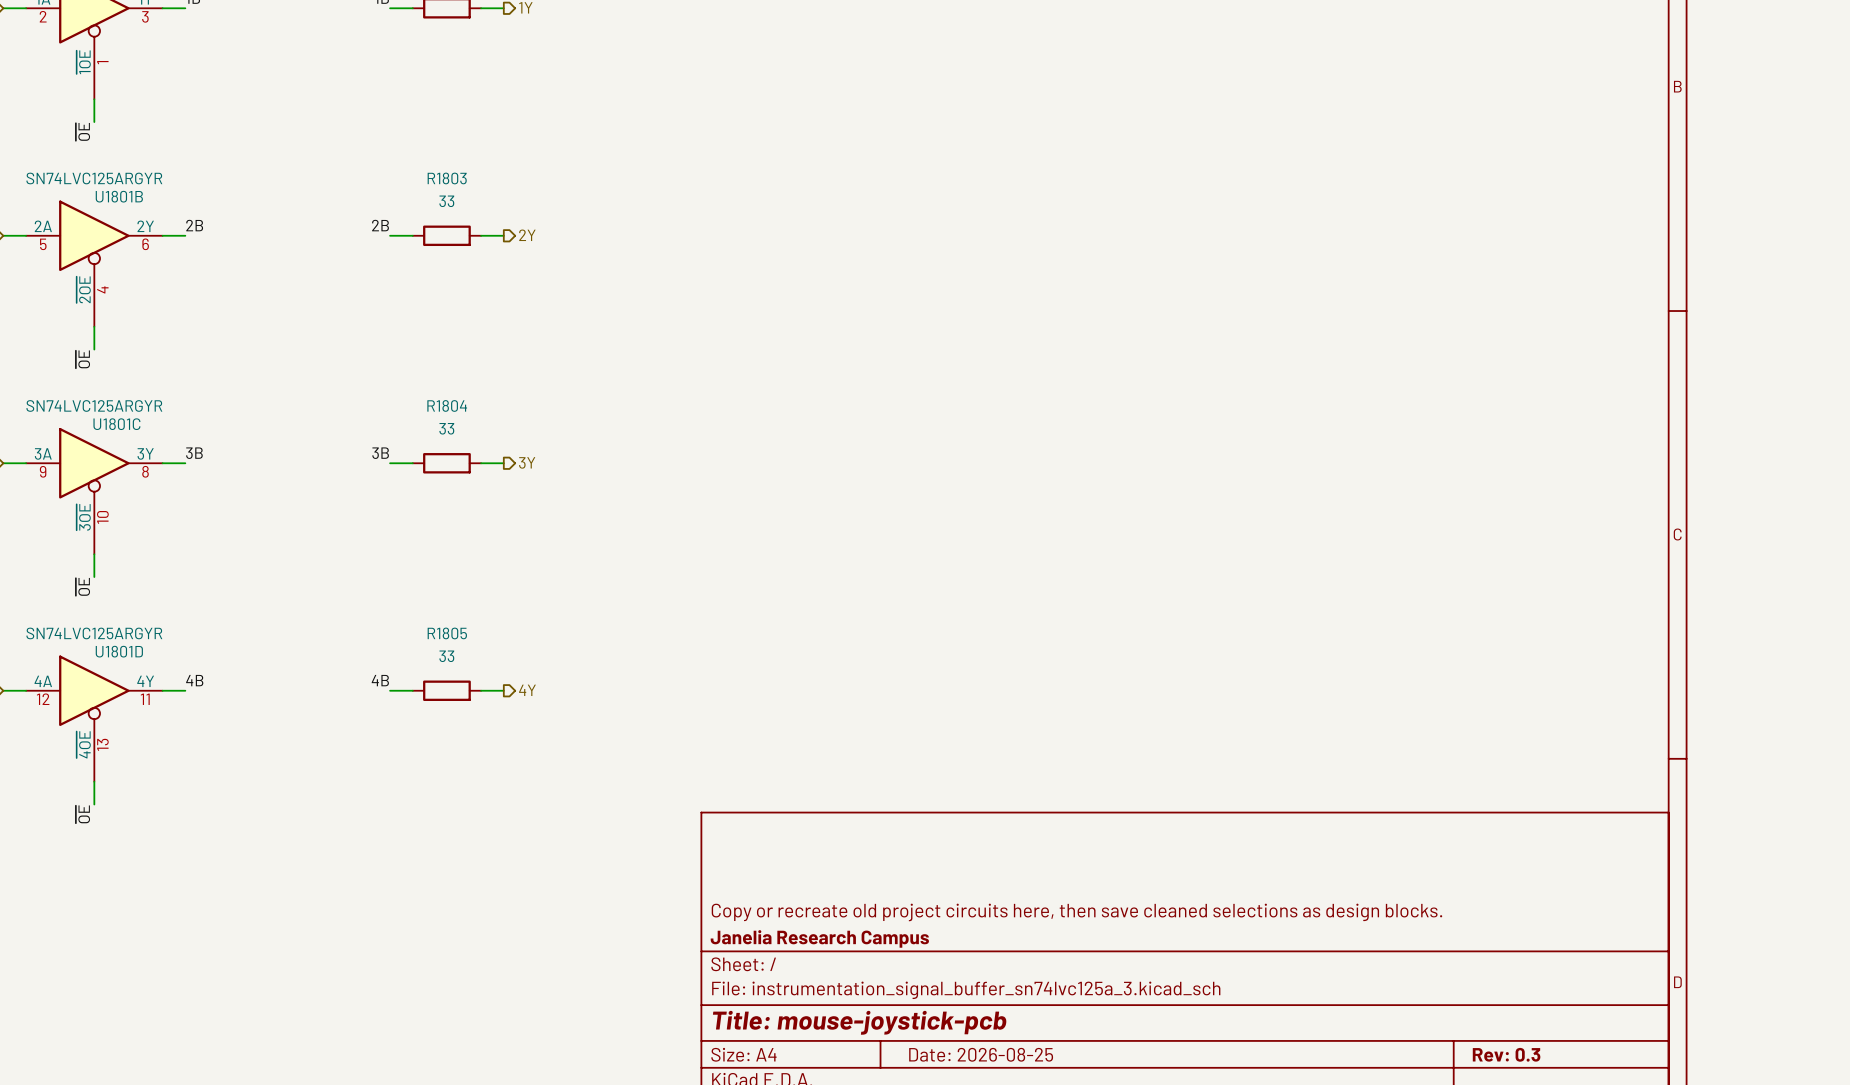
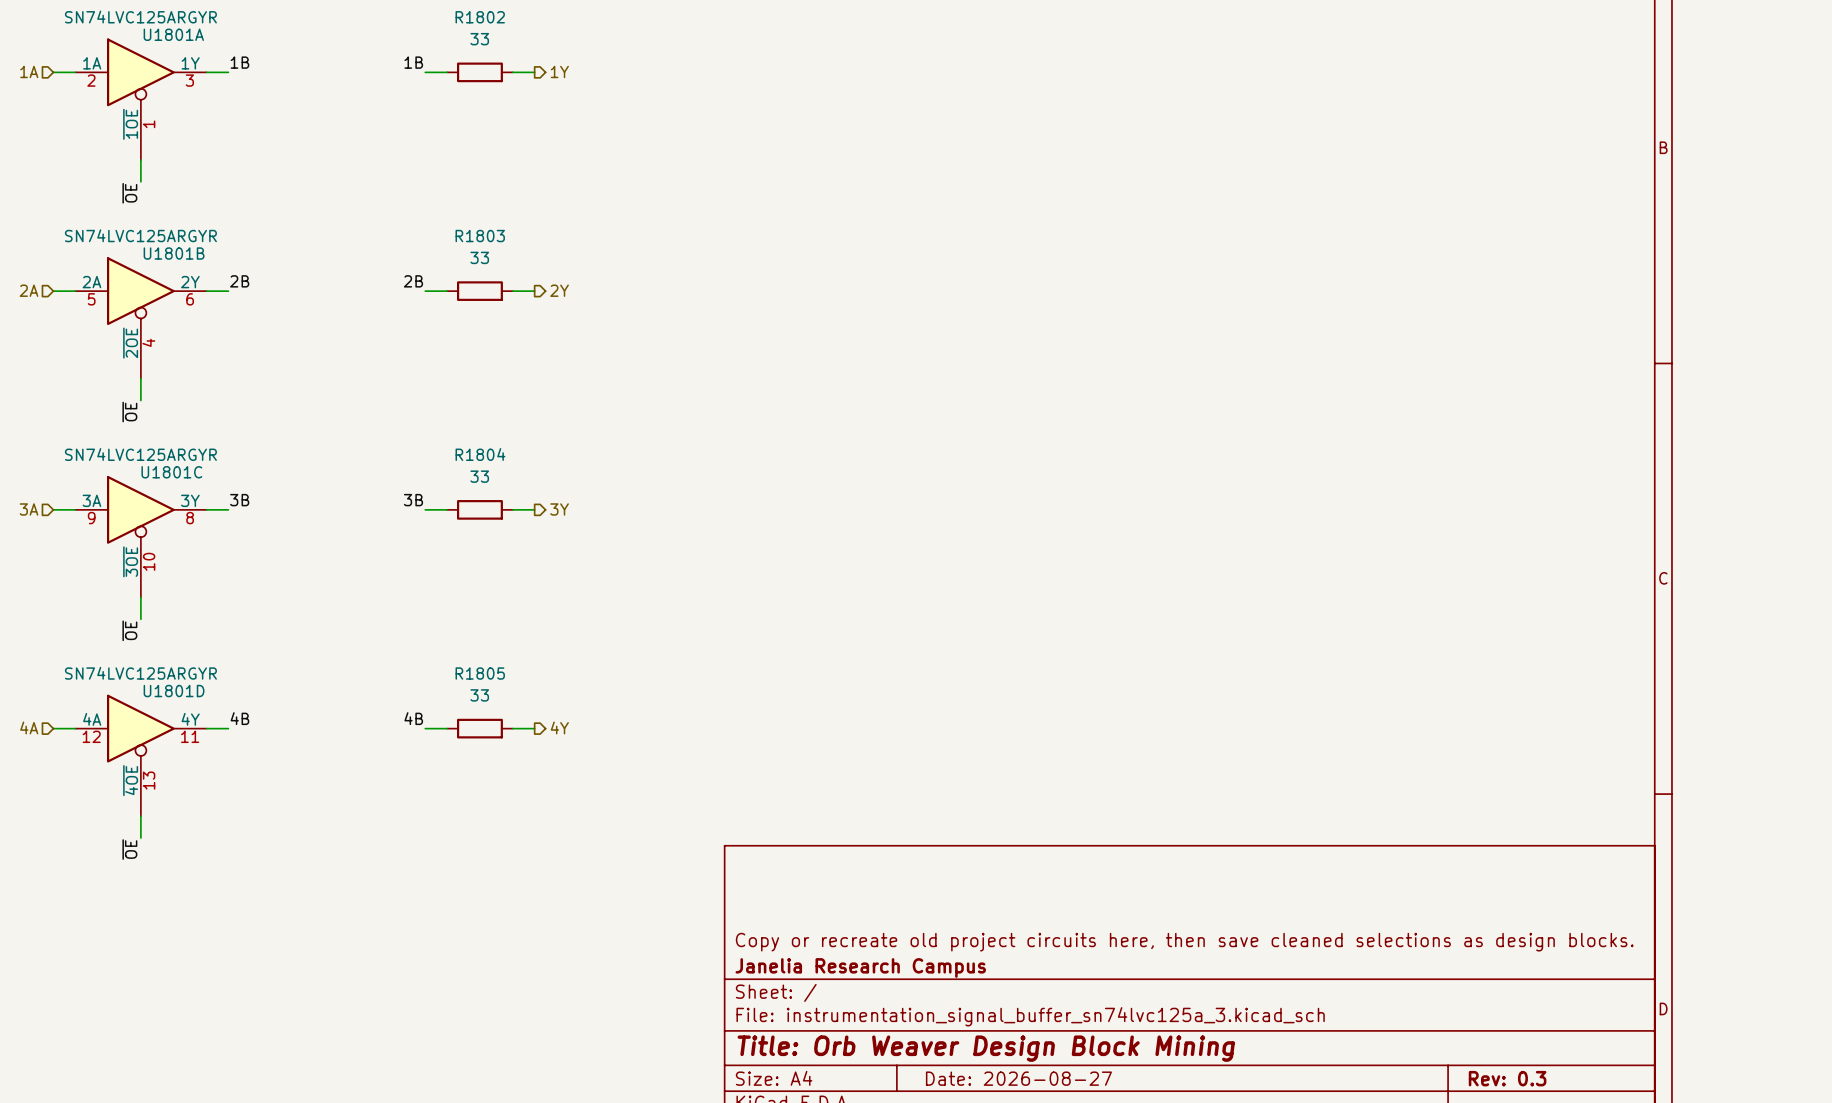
title block: Title: mouse-joystick-pcb (859, 1022) -> Title: Orb Weaver Design Block Mining (986, 1048)
title block: Date: 2026-08-25 (981, 1054) -> Date: 2026-08-27 (1018, 1078)

